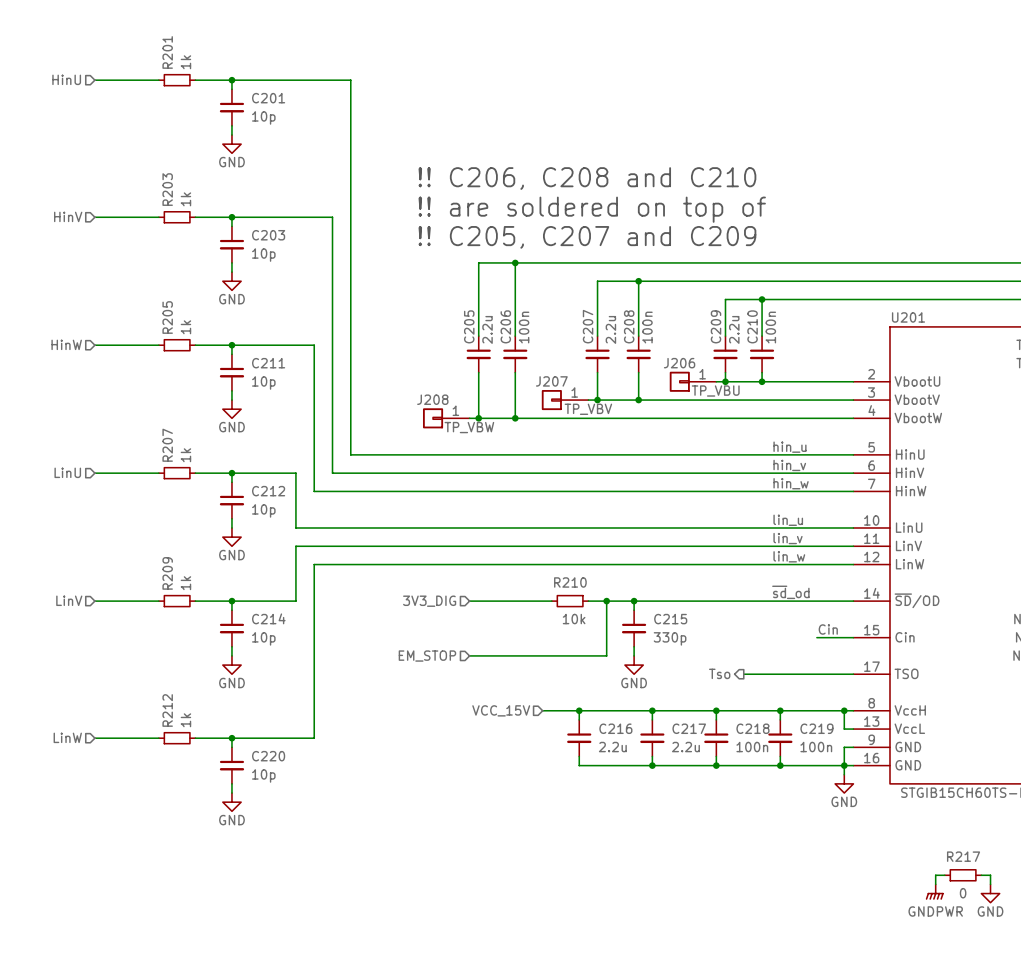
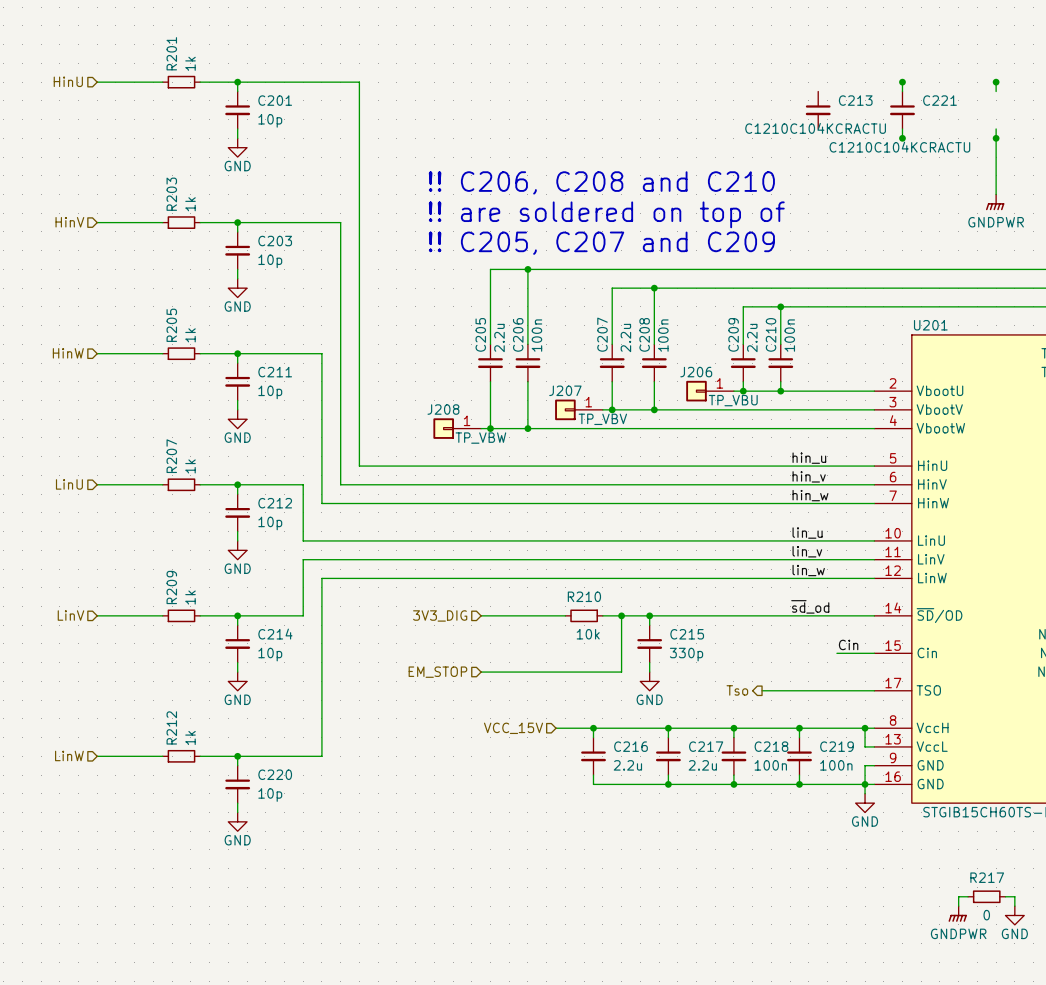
wire: none -> (902, 82) (902, 91)
junction: none -> (902, 82)
wire: none -> (996, 82) (996, 91)
junction: none -> (996, 82)
C213: none -> C1210C104KCRACTU (818, 110)
C221: none -> C1210C104KCRACTU (902, 110)
wire: none -> (902, 128) (902, 138)
wire: none -> (996, 128) (996, 194)
junction: none -> (902, 138)
junction: none -> (996, 138)
power symbol: none -> GNDPWR (995, 202)

